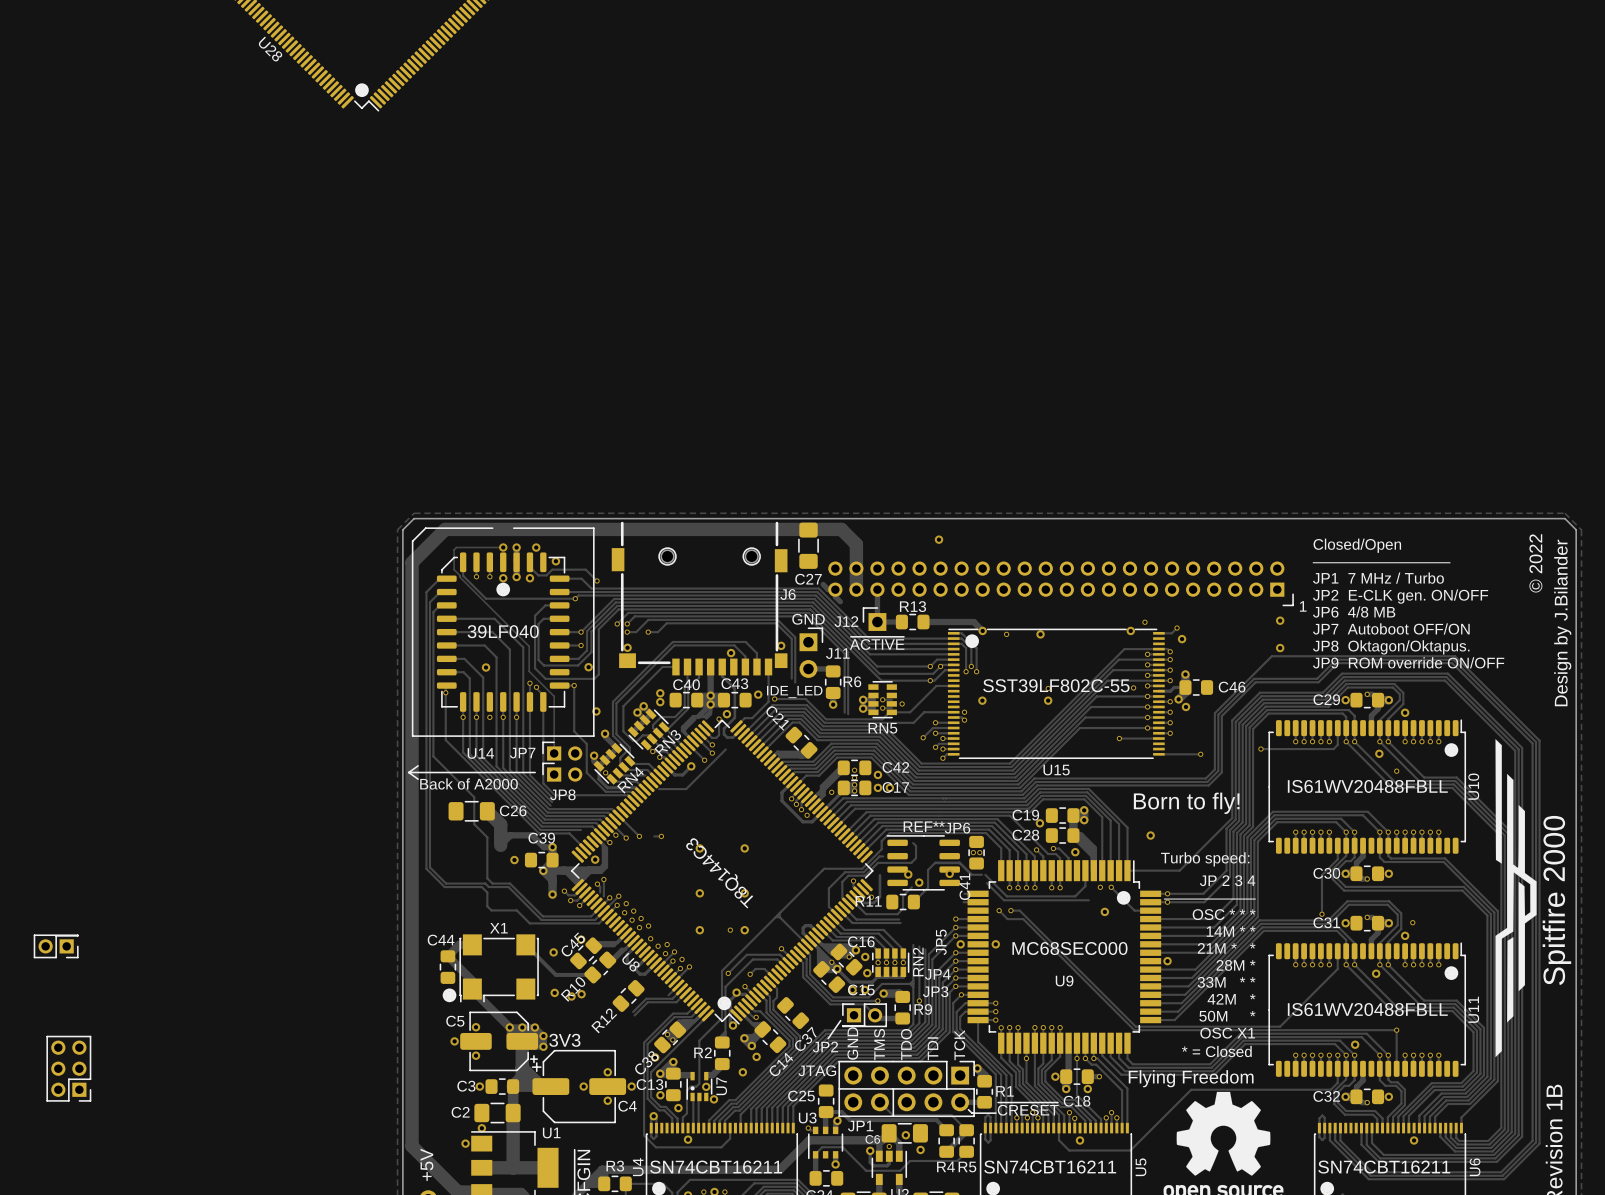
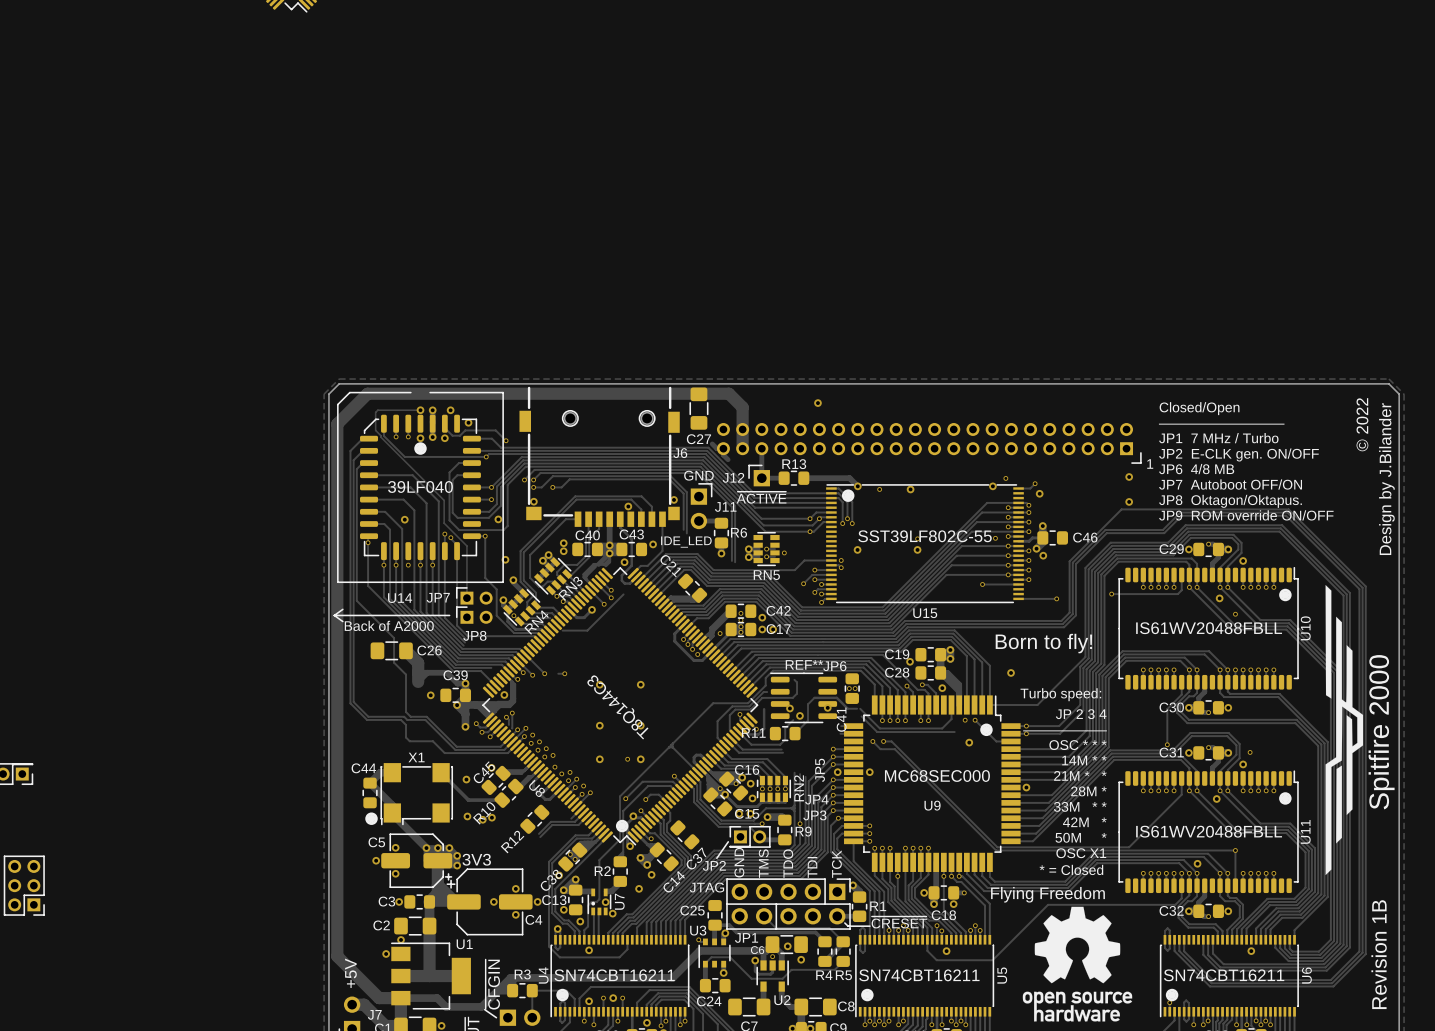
track: (953, 685) (936, 685) (910, 712) (889, 712) (882, 719) (826, 719) (805, 699) (774, 699) -> none
via: (774, 699) -> none
track: (719, 719) (719, 735) (716, 737) (712, 737) (704, 730) -> none
via: (719, 719) -> none

